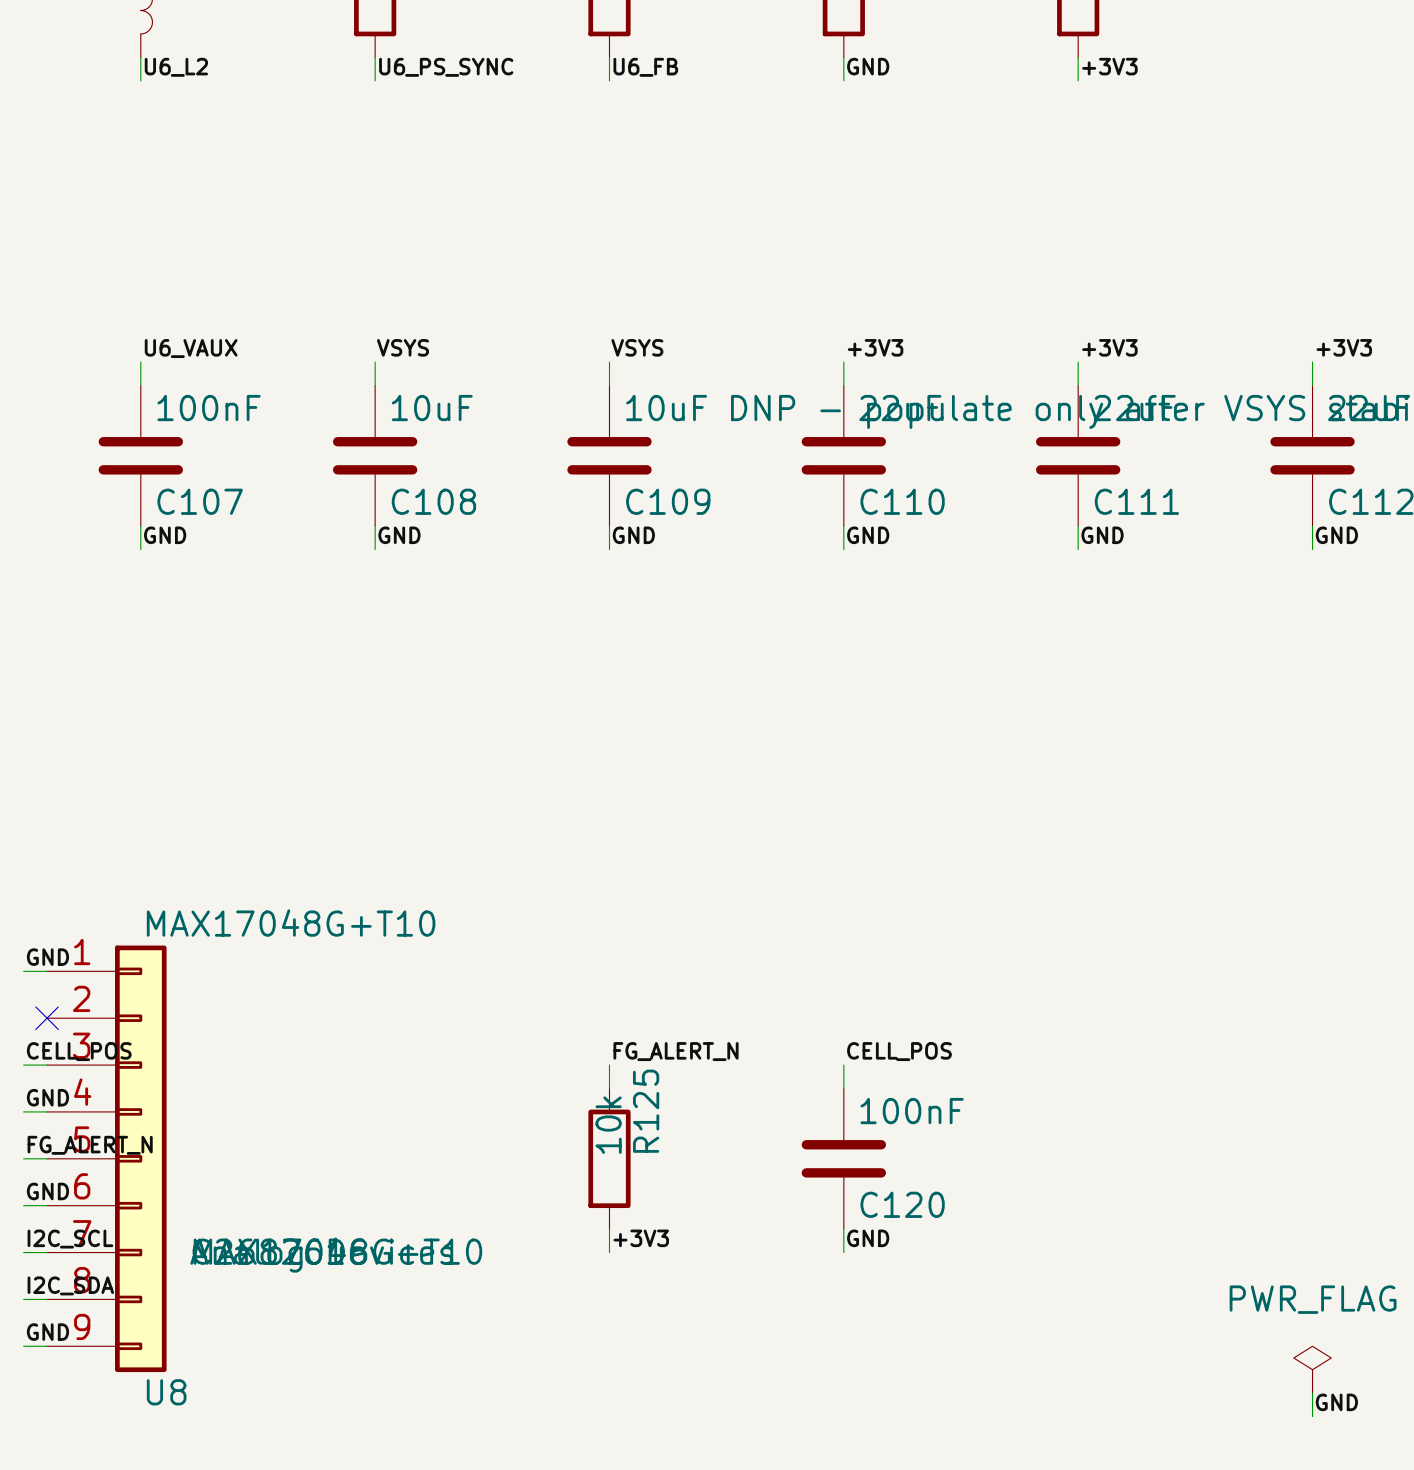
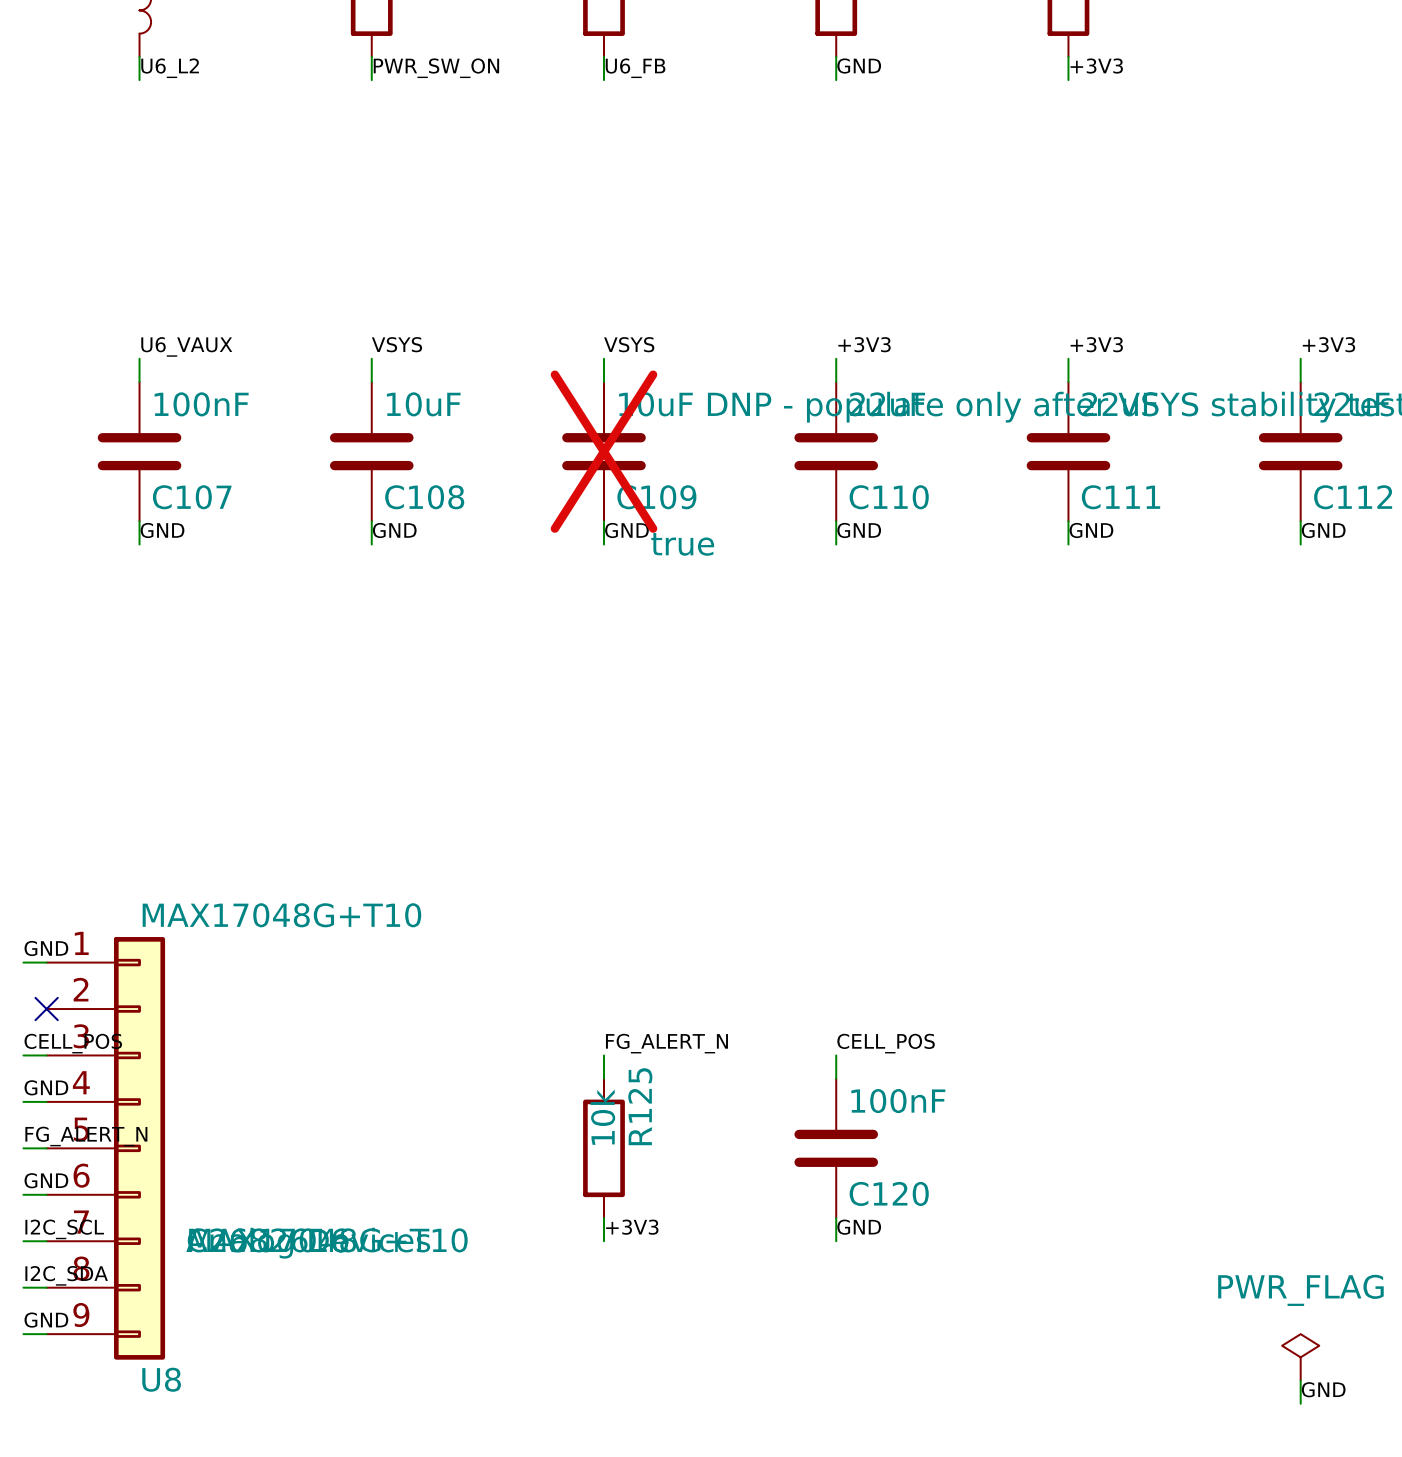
label: U6_PS_SYNC (446, 67) -> PWR_SW_ON (436, 68)
C109 do-not-place cross: none -> (603, 451)
C109 text: none -> true (682, 544)

